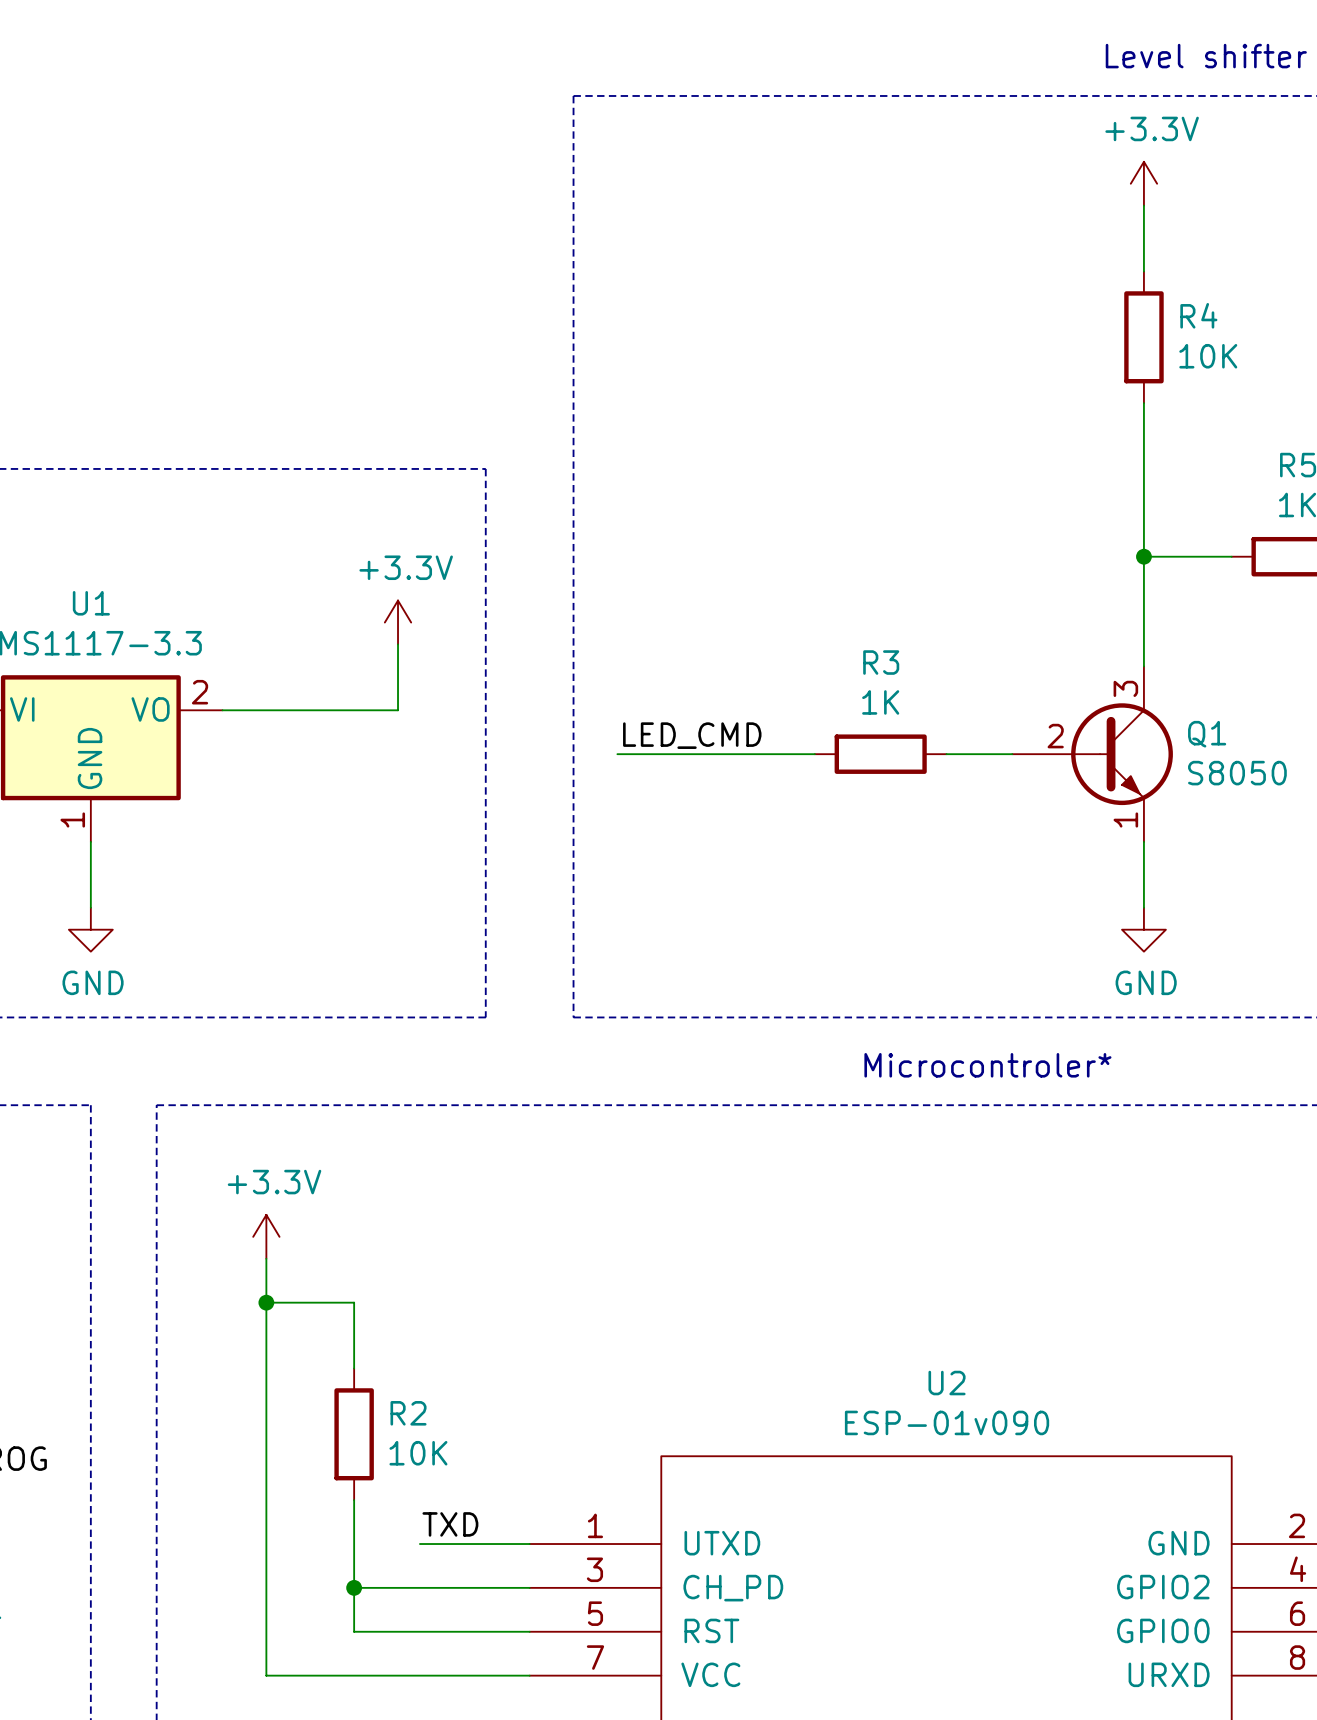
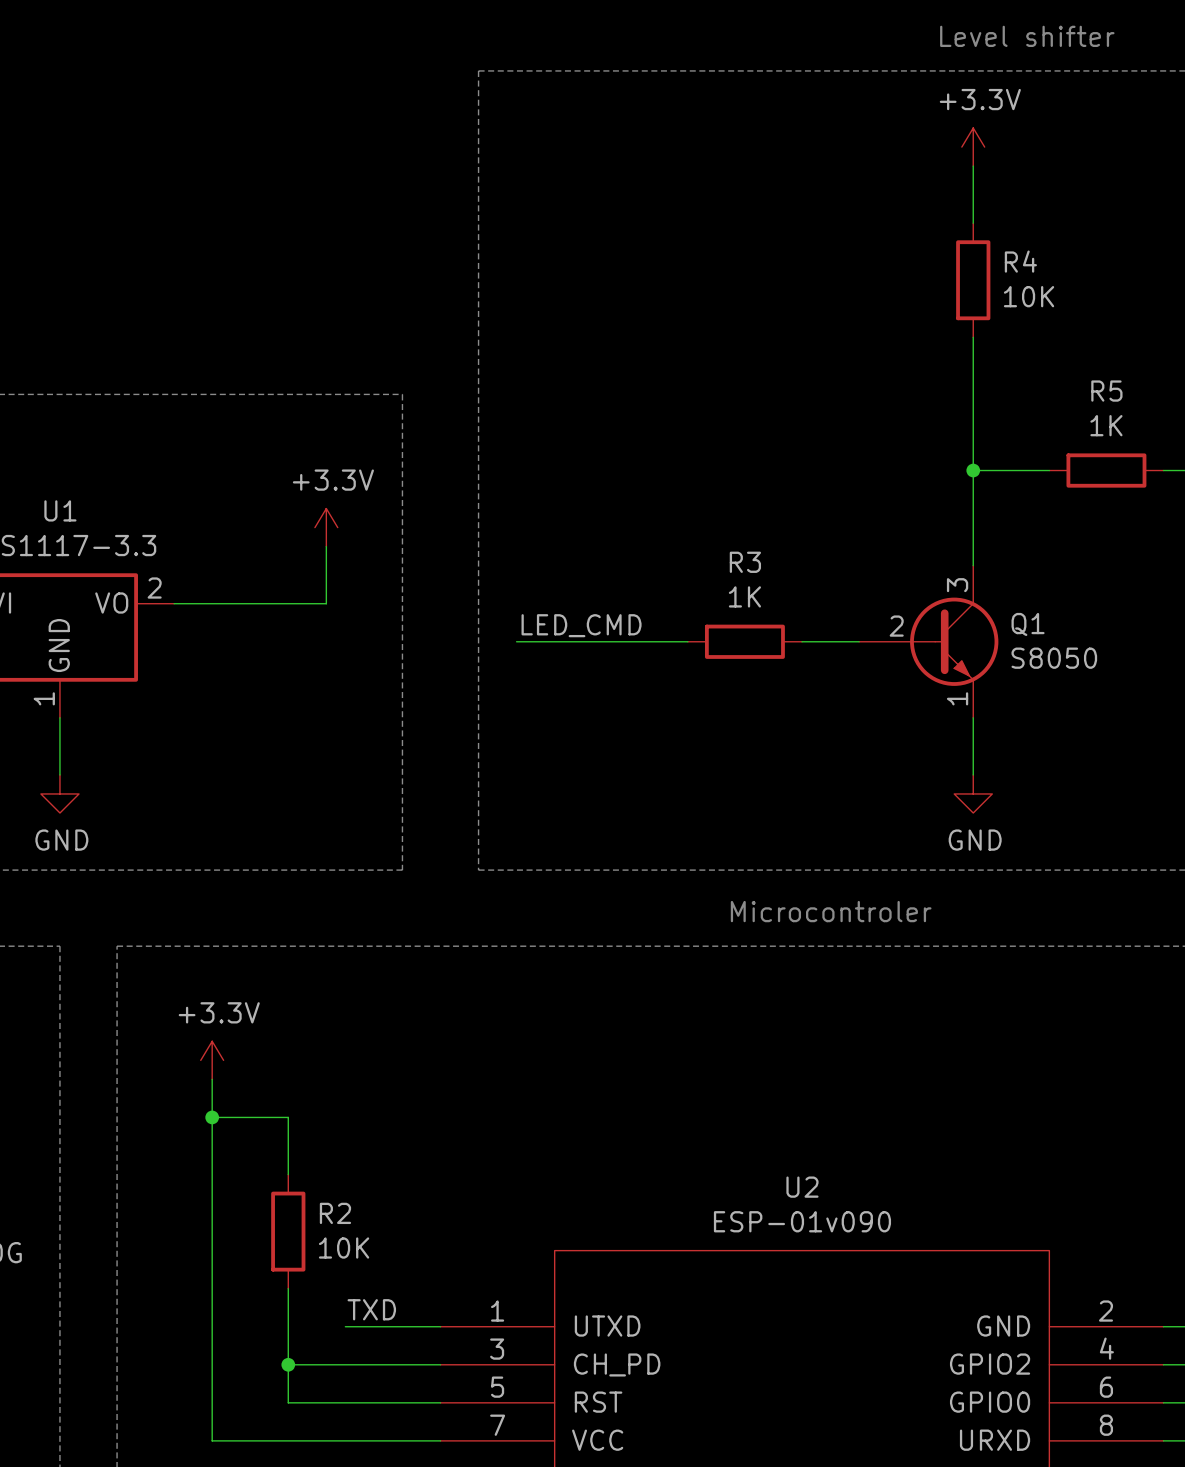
text: Microcontroler* (987, 1065) -> Microcontroler (831, 911)

